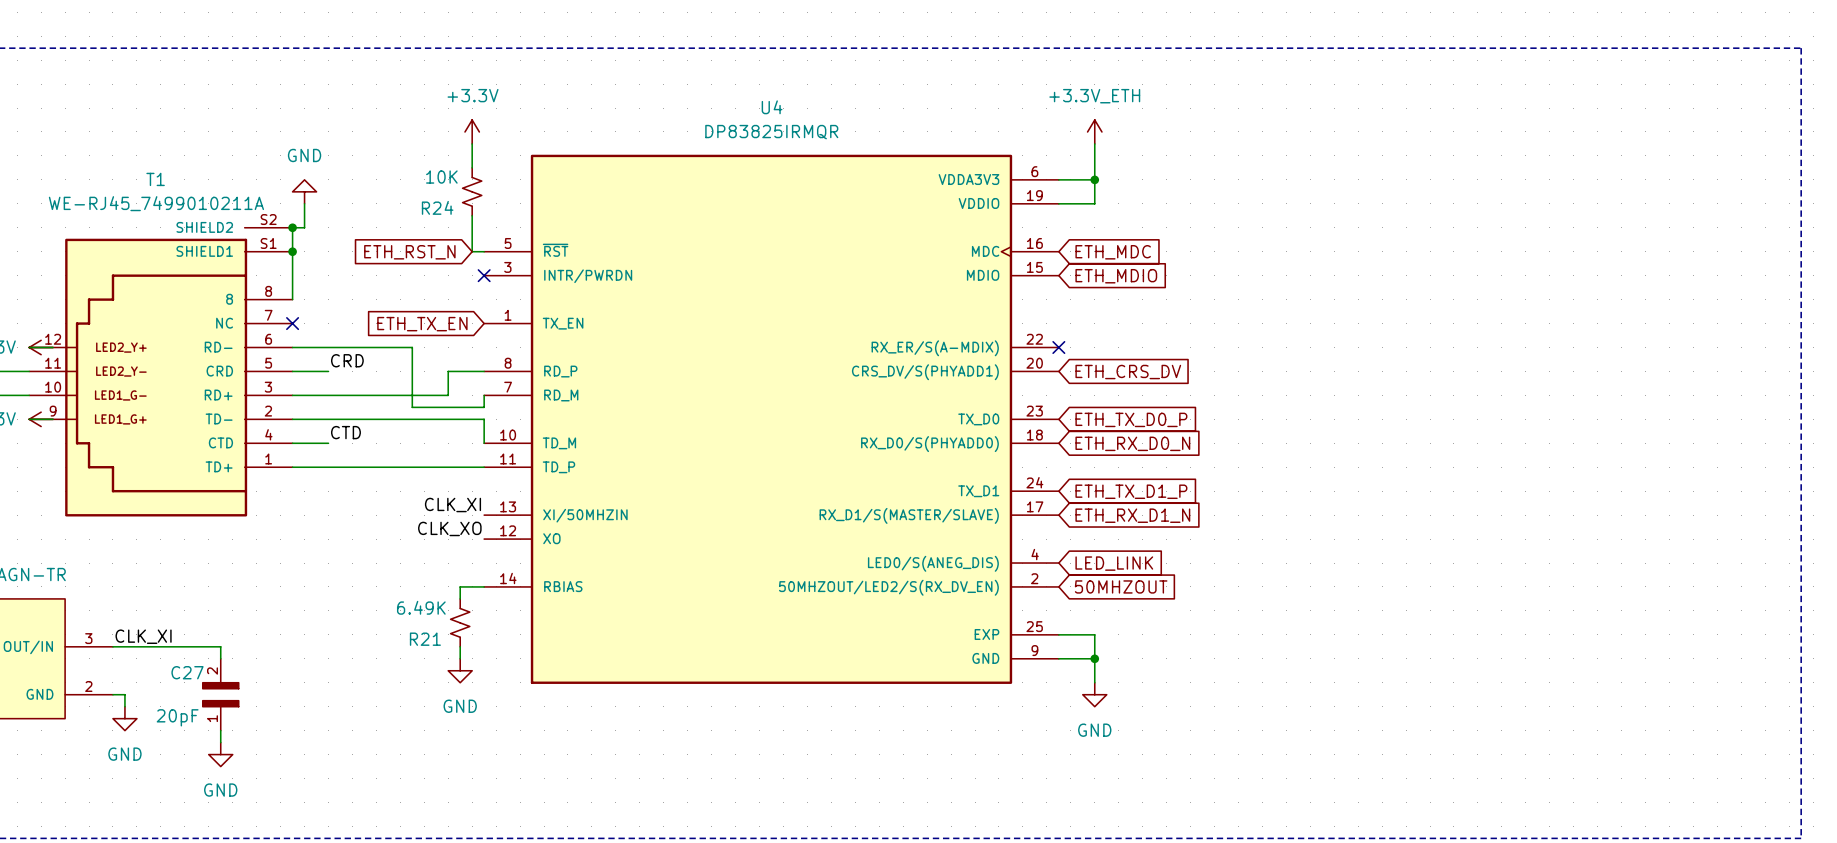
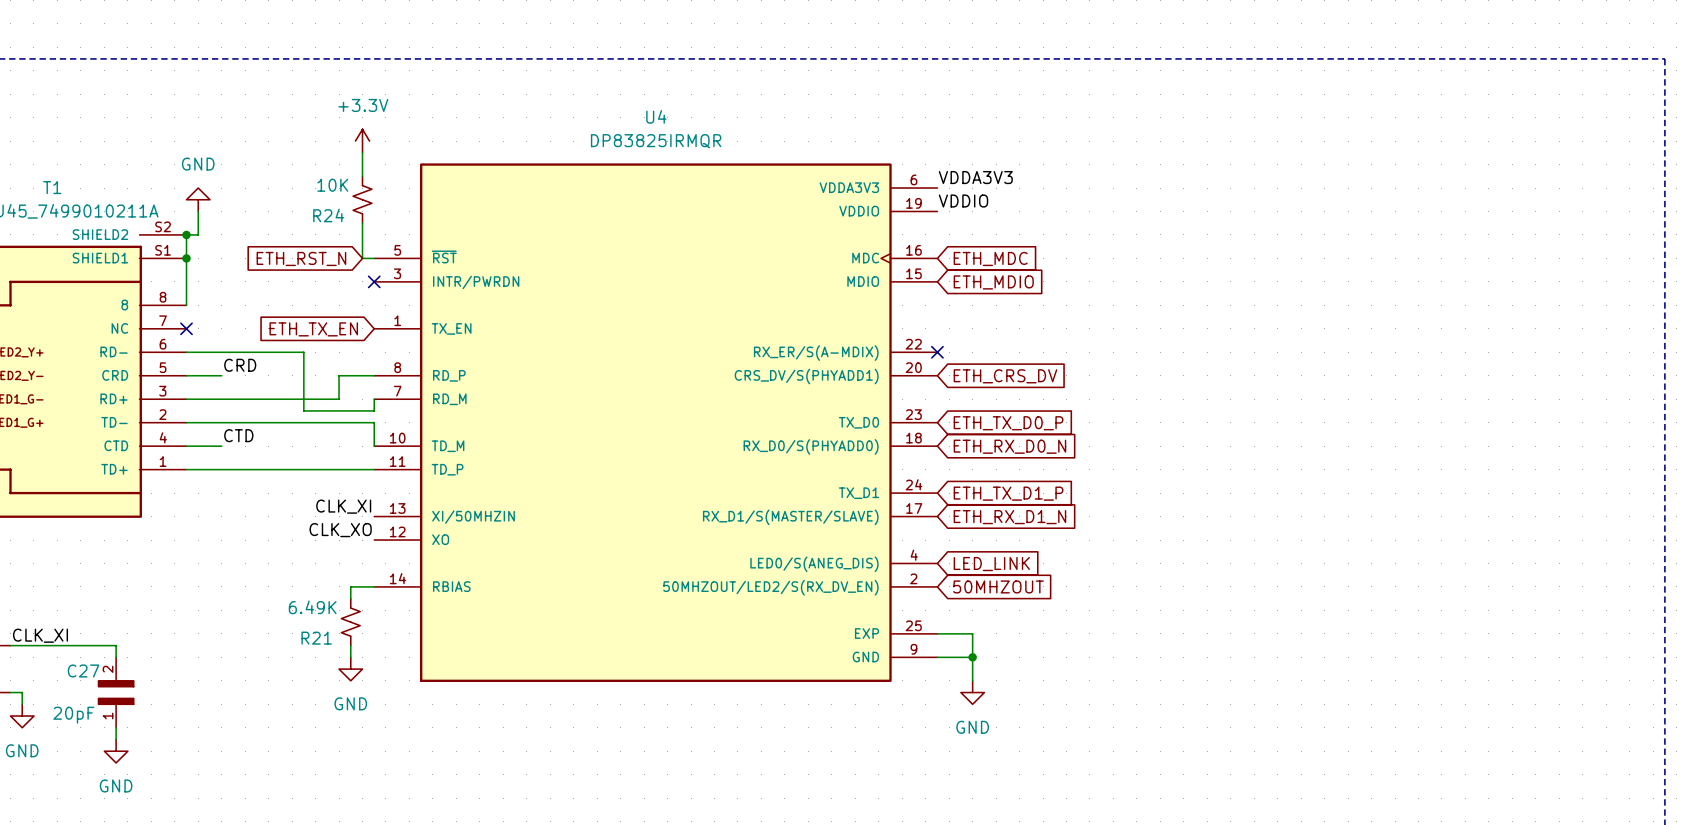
power symbol: +3.3V_ETH (1094, 131) -> none
wire: (1094, 143) (1094, 203) (1058, 203) -> none
label: none -> VDDA3V3 (975, 177)
wire: (1058, 179) (1094, 179) -> none
junction: (1094, 179) -> none
label: none -> VDDIO (963, 201)

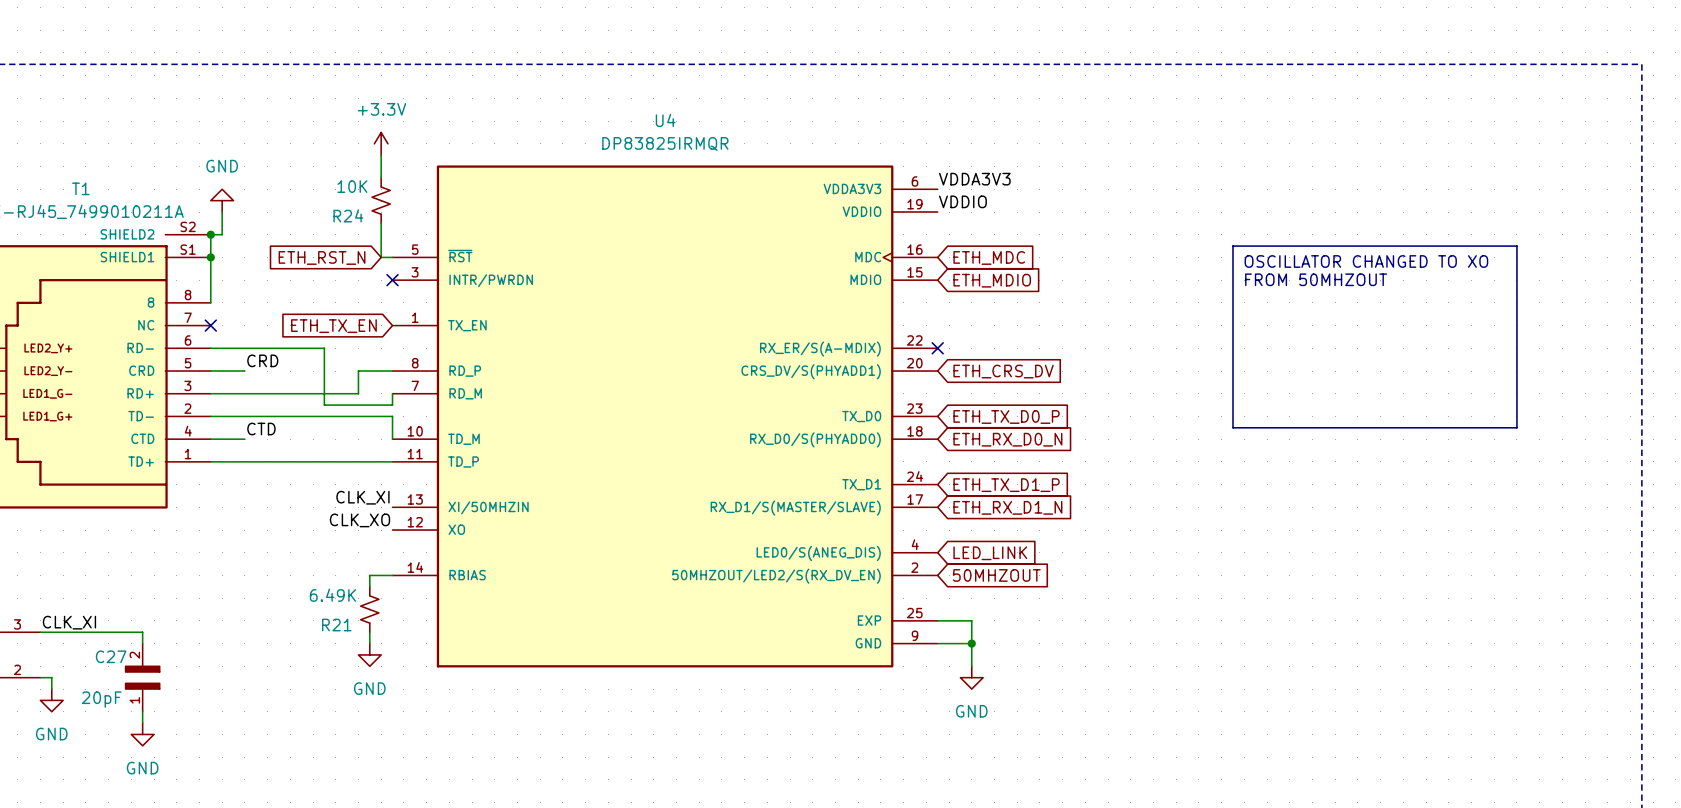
line: none -> (1233, 246) (1516, 246) (1516, 427) (1233, 427) (1233, 246)
text: none -> OSCILLATOR CHANGED TO XO (1366, 261)
text: none -> FROM 50MHZOUT (1316, 279)

